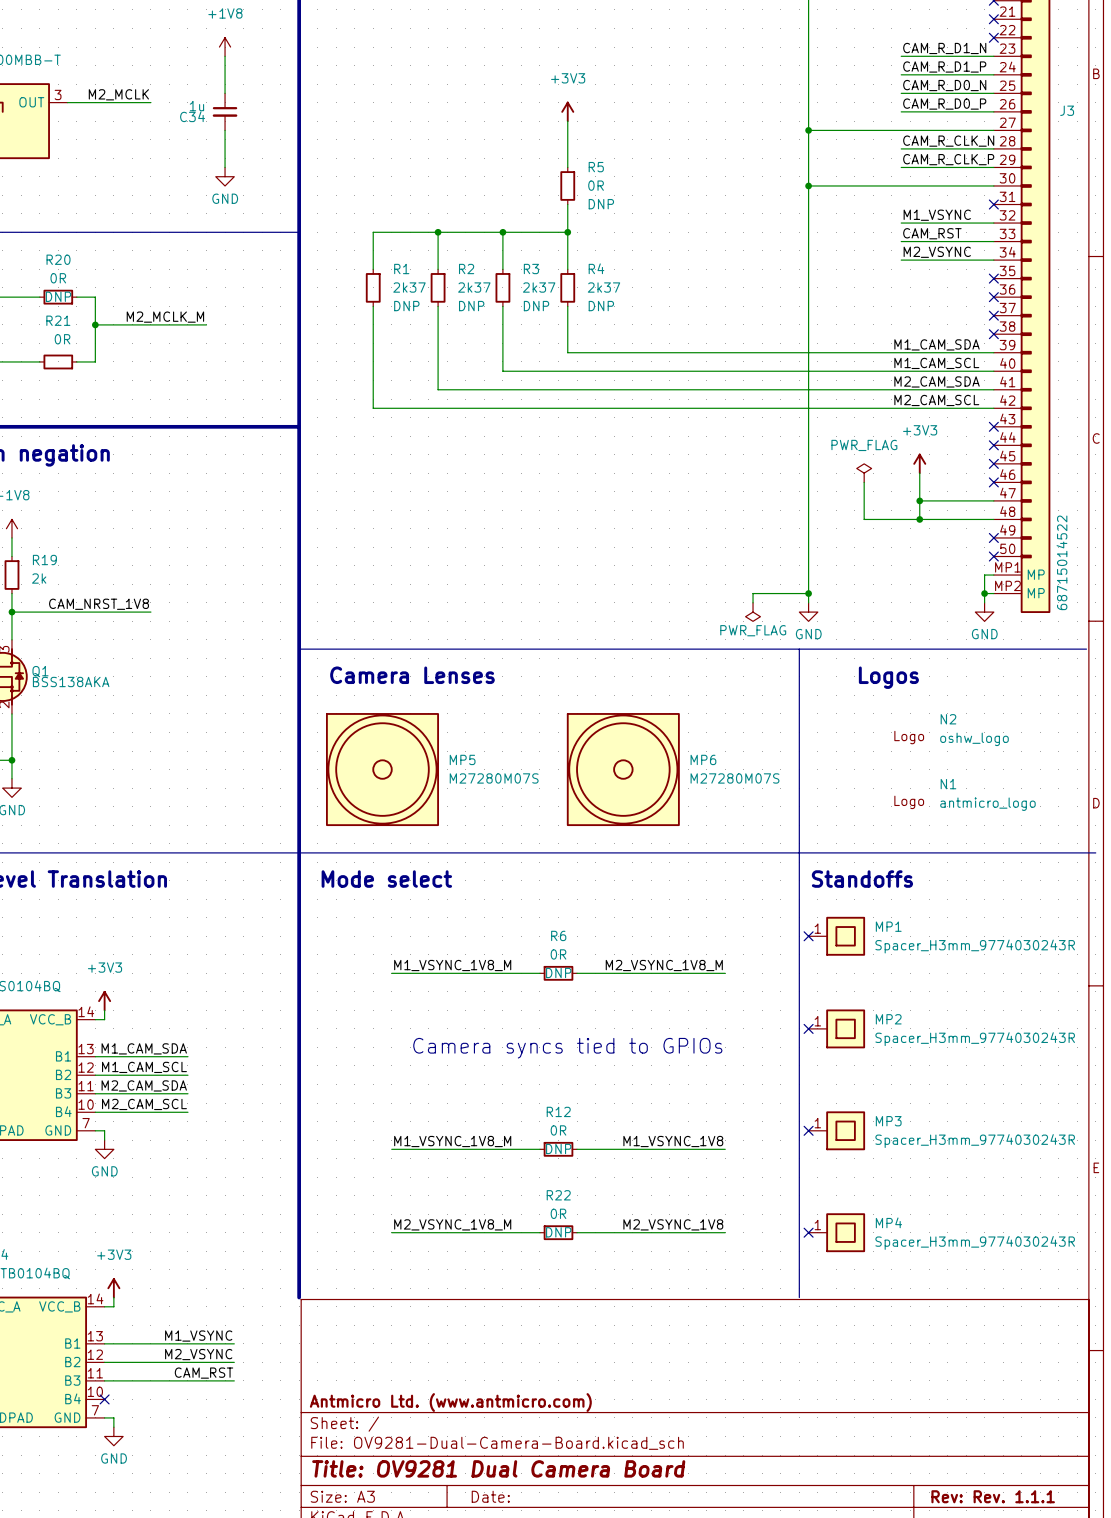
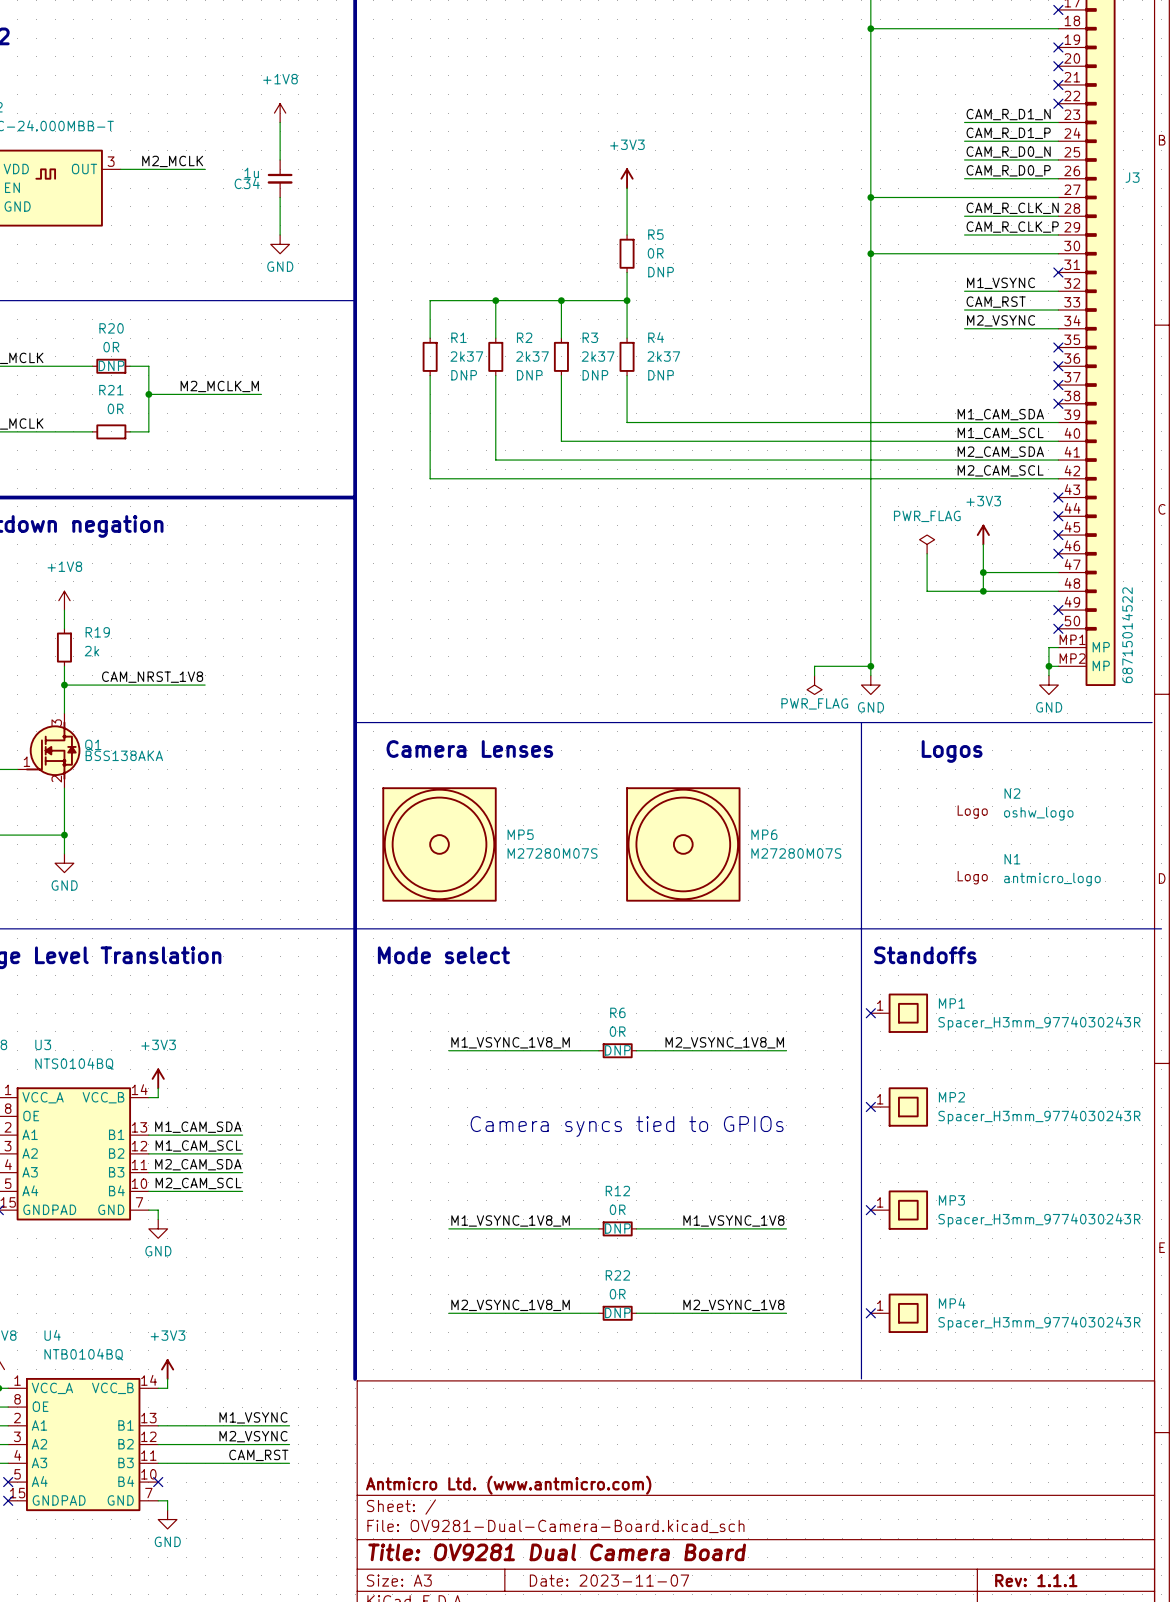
title block: Date: (490, 1496) -> Date: 2023-11-07 (609, 1580)
title block: Rev: Rev. 1.1.1 (993, 1496) -> Rev: 1.1.1 (1036, 1580)

